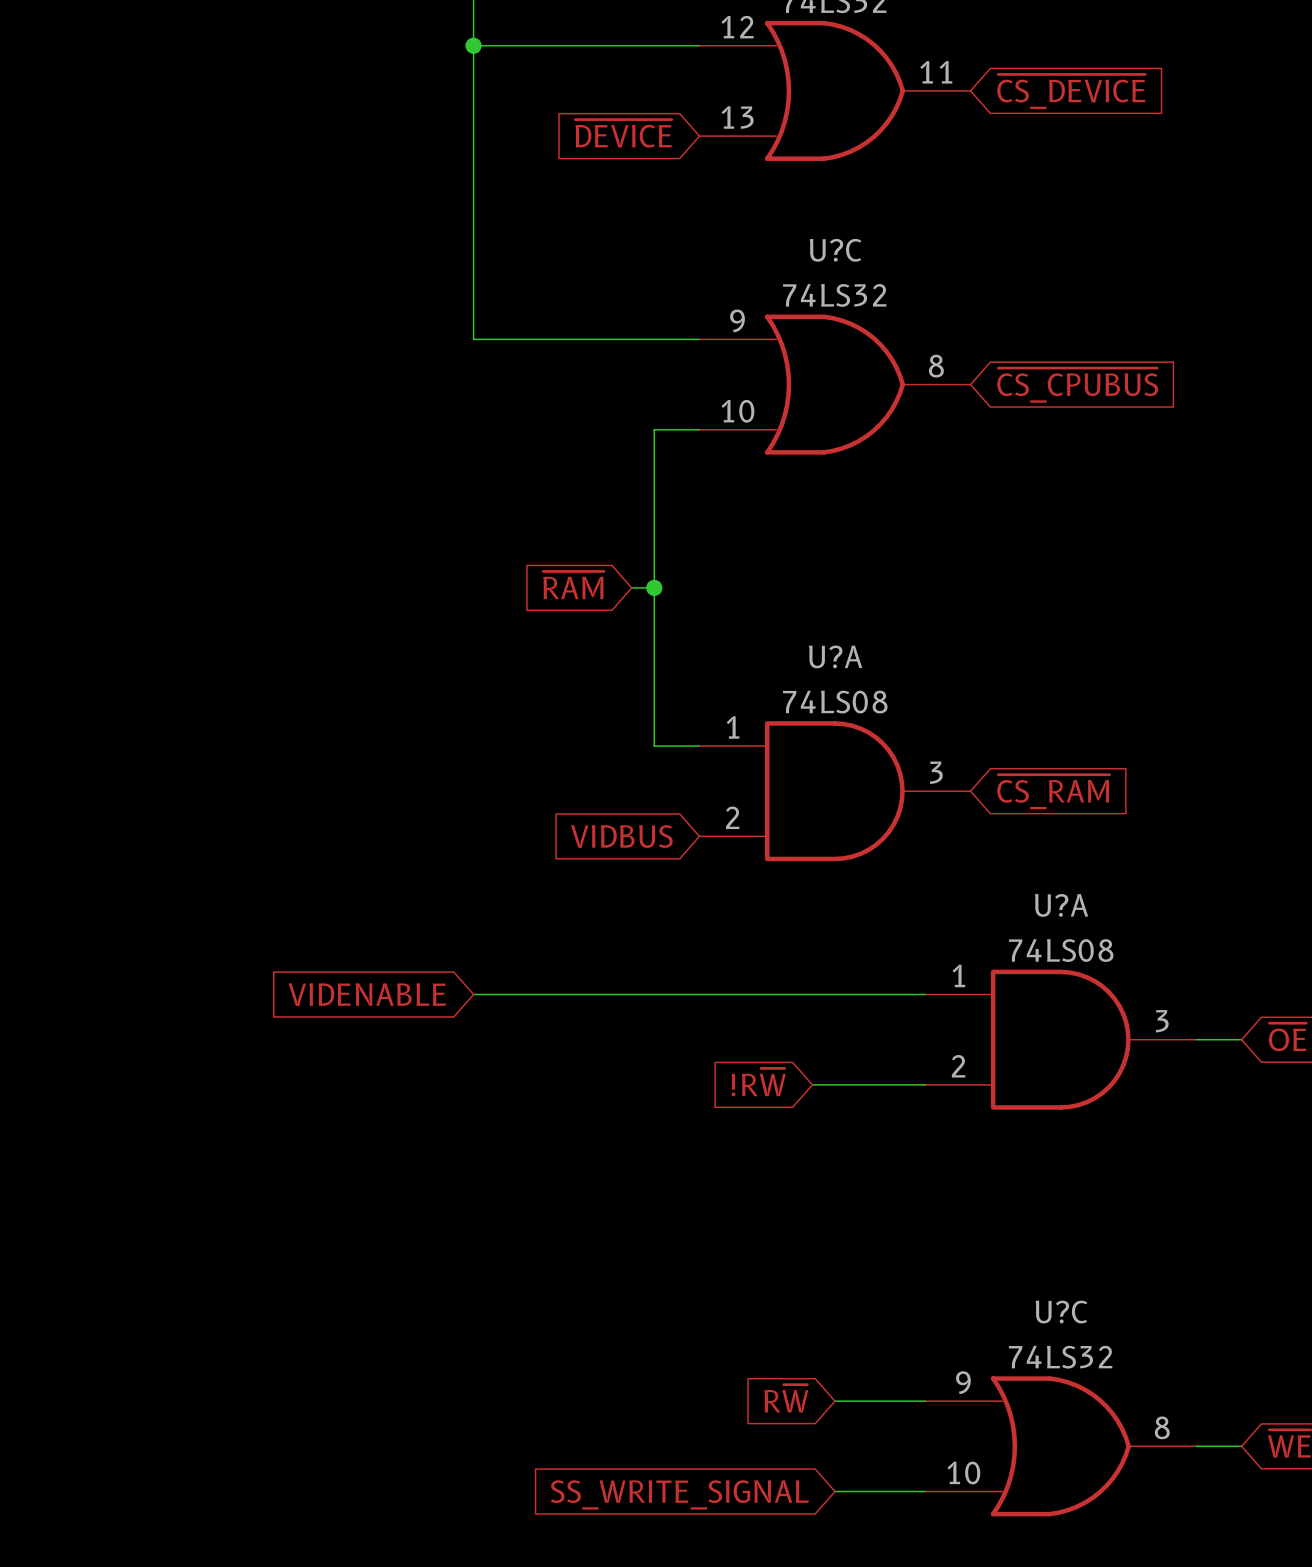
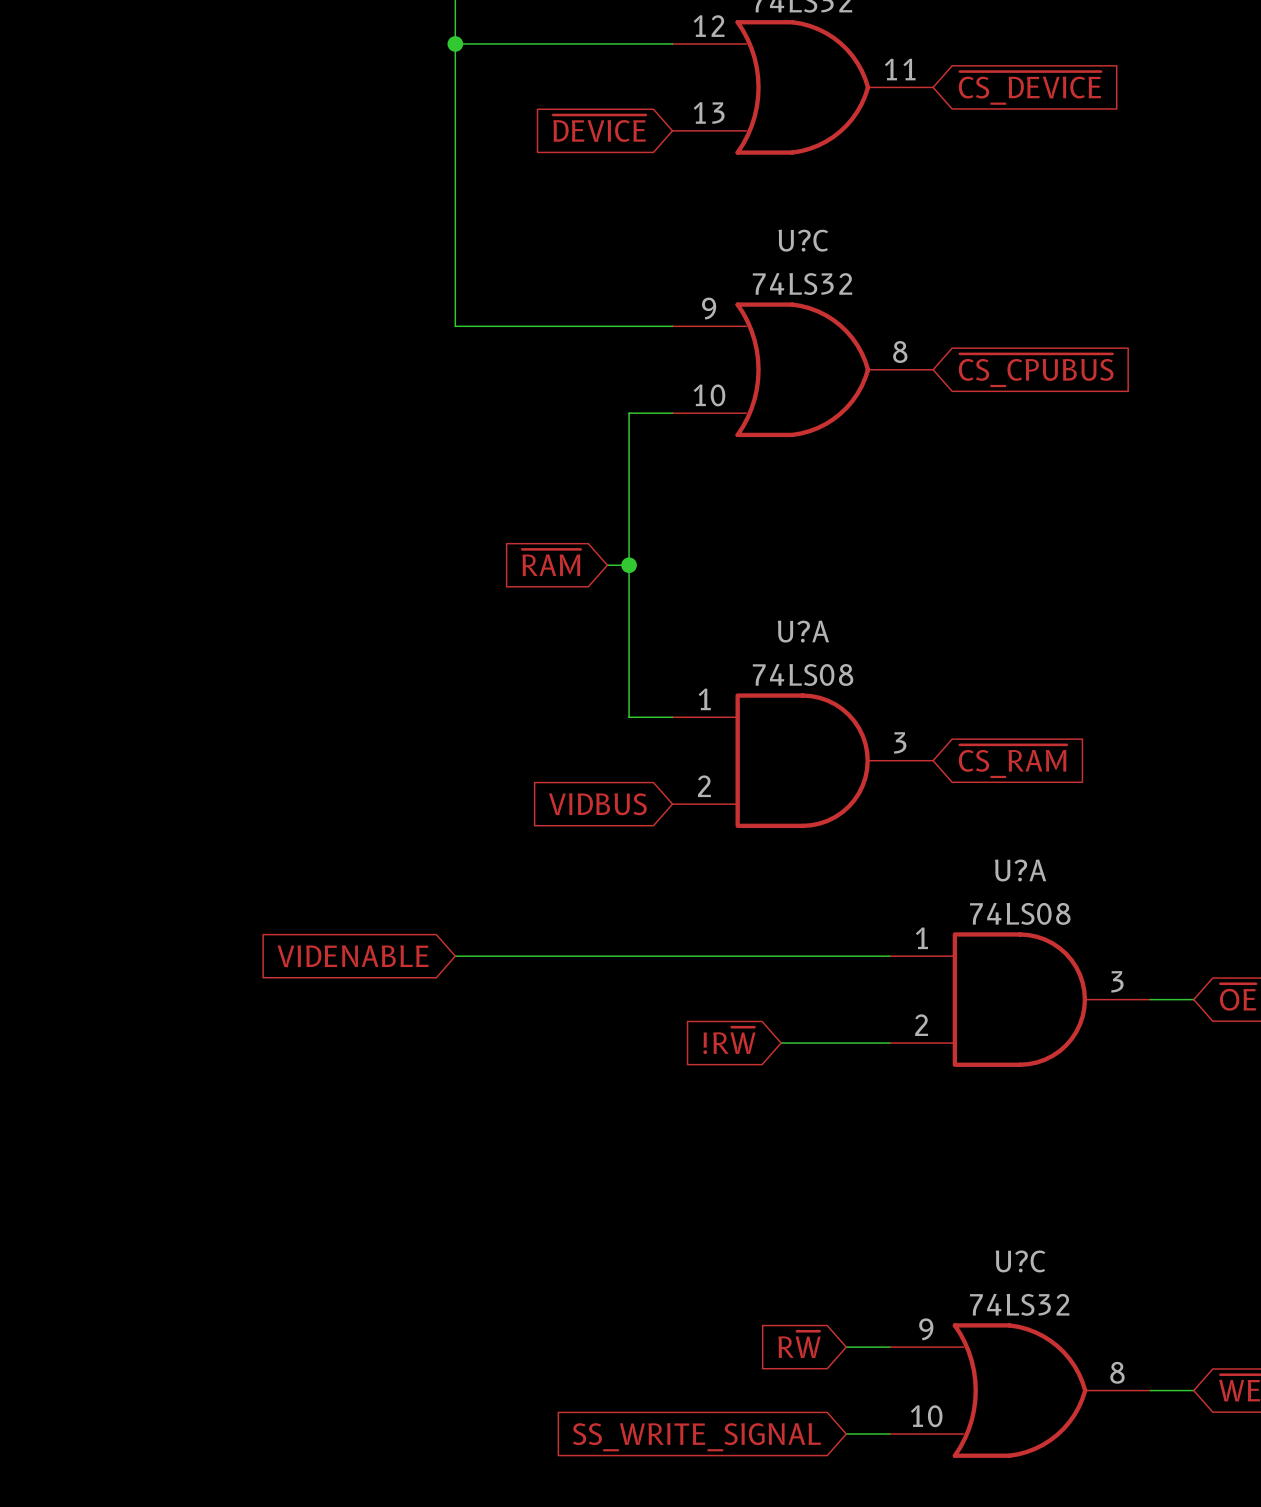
global label position: R~{W} (786, 1398) -> R~{W} (799, 1344)
wire: (835, 1401) (880, 1401) -> none
wire: (835, 1491) (880, 1491) -> none
global label position: SS_WRITE_SIGNAL (679, 1494) -> SS_WRITE_SIGNAL (696, 1437)

